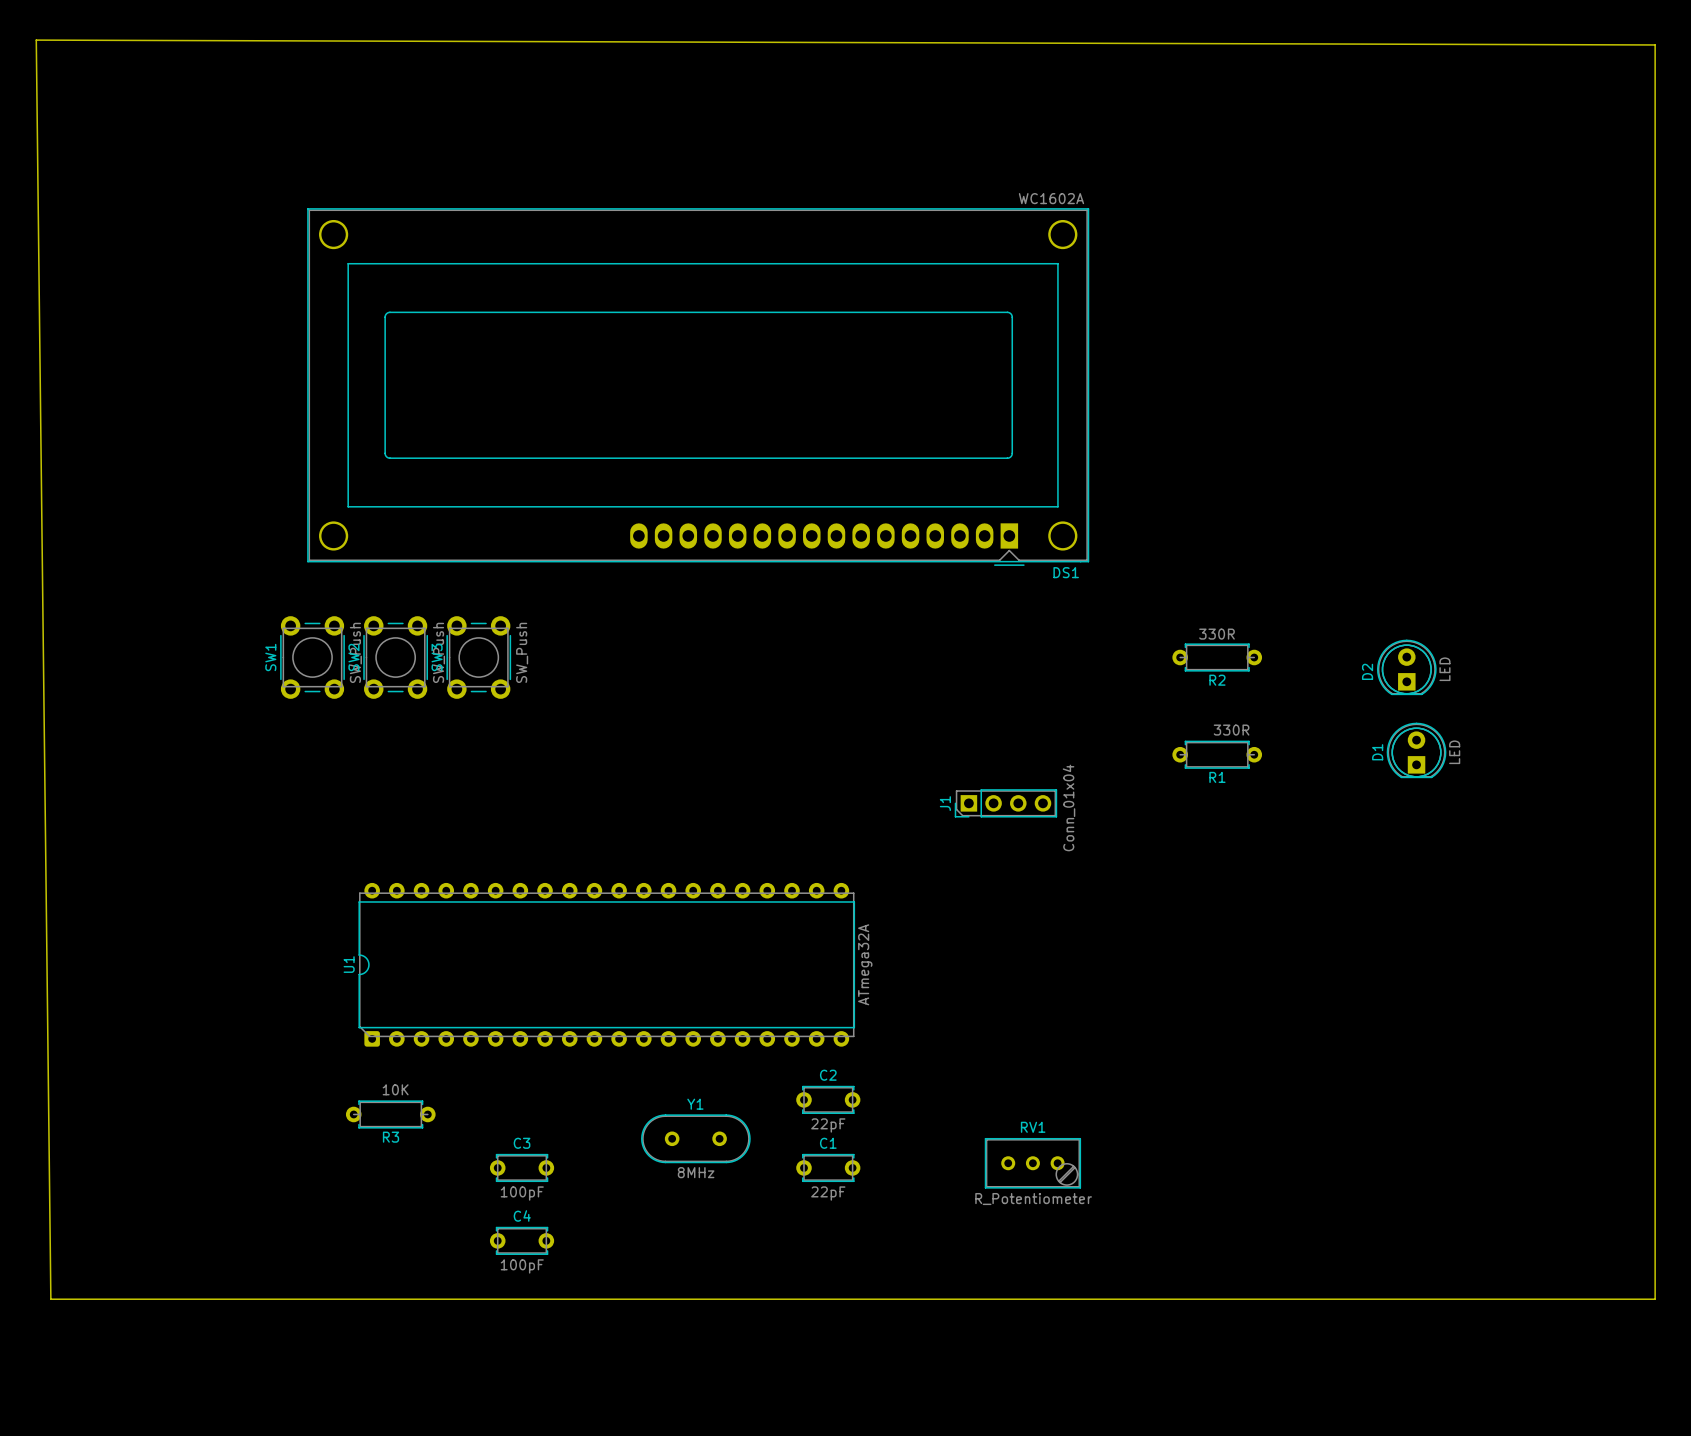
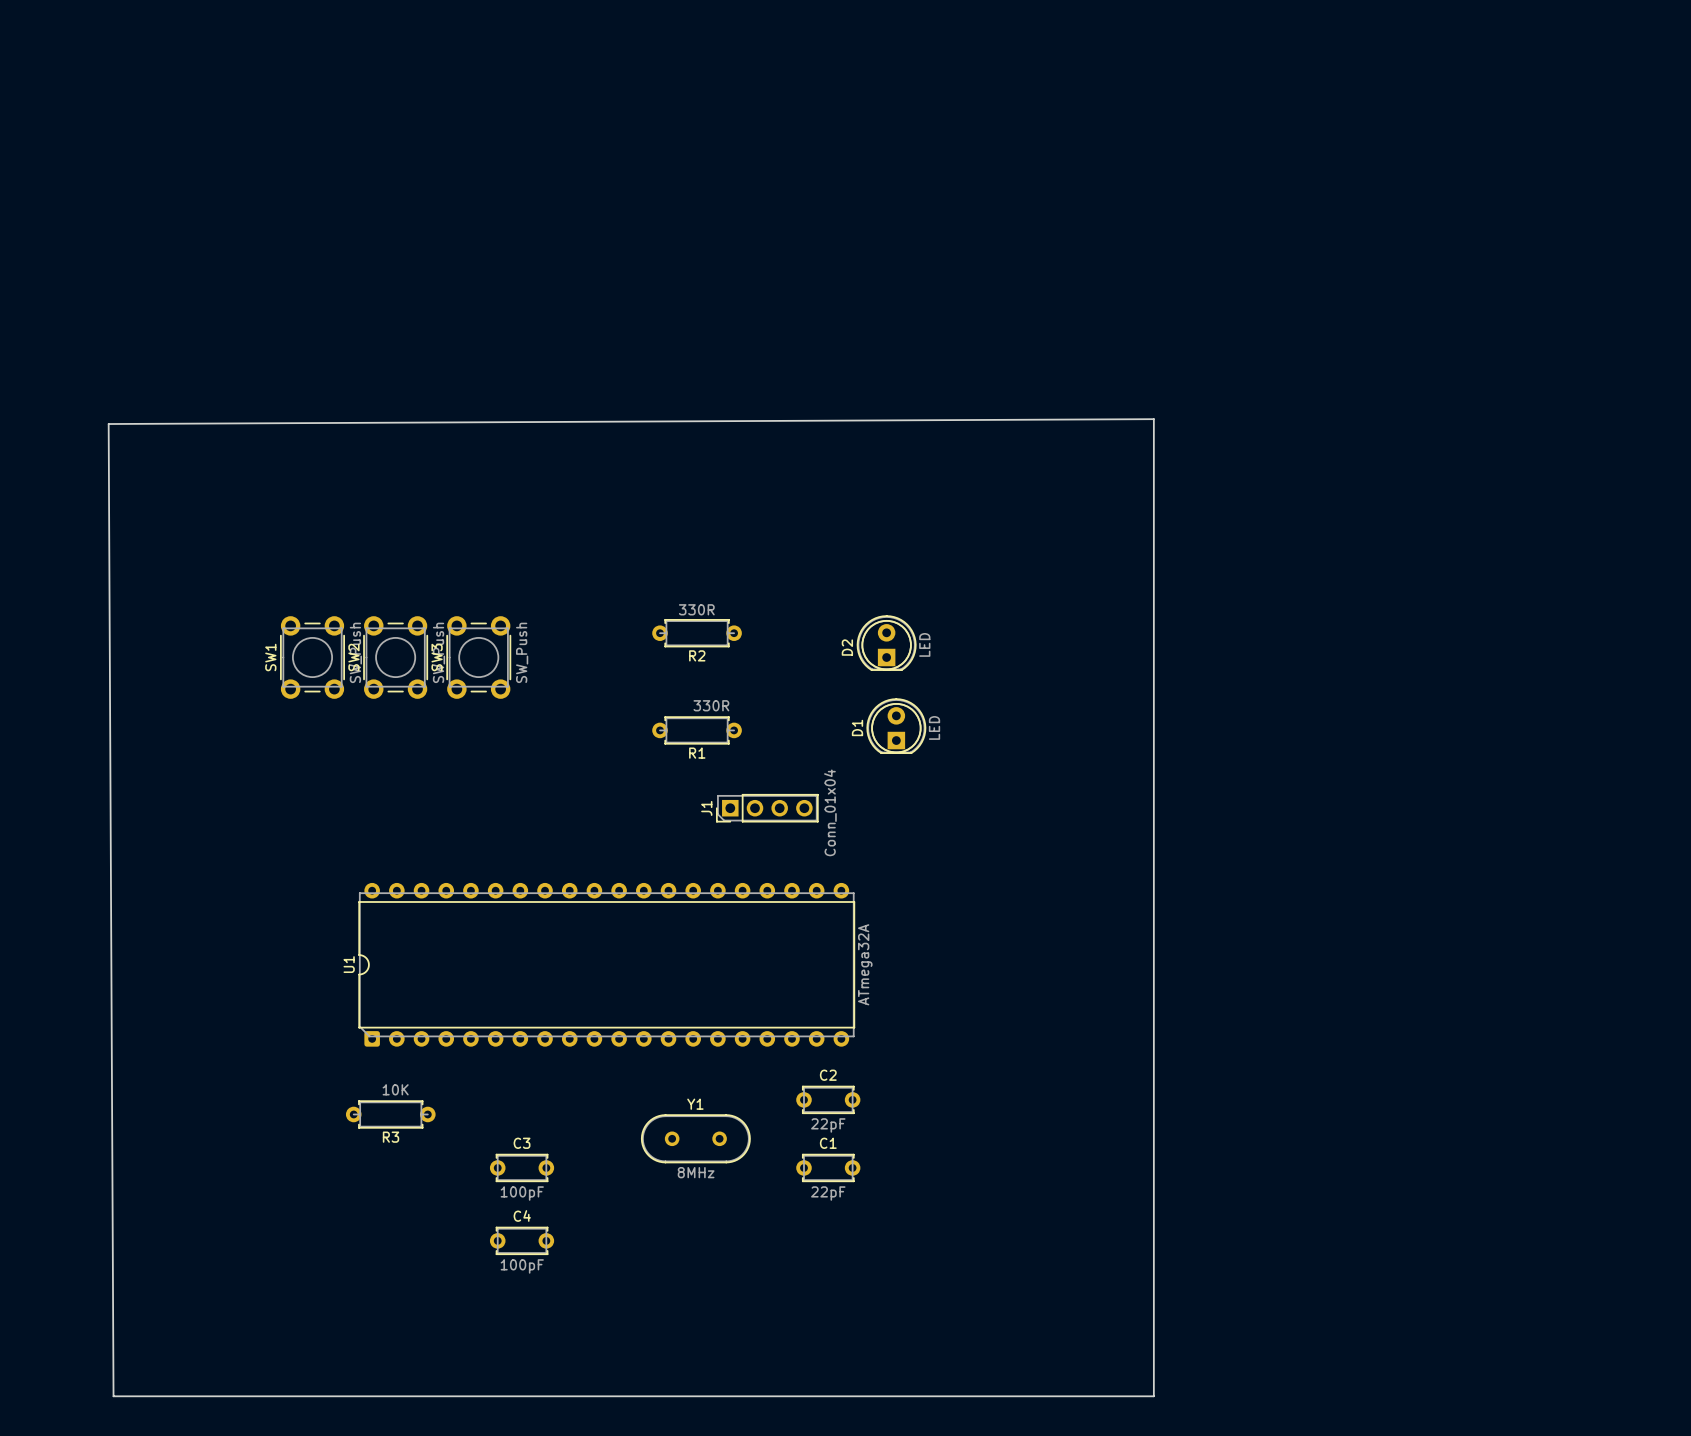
board edge: (36, 40) (1655, 44) (1655, 1299) (50, 1299) (36, 40) -> none
DS1: WC1602A (698, 387) -> none
board edge: none -> (1153, 419) (108, 424) (113, 1396) (1153, 1396) (1153, 419)
R2 position: (1217, 657) -> (697, 633)
D2 position: (1406, 667) -> (886, 643)
D1 position: (1416, 750) -> (896, 726)
R1 position: (1217, 754) -> (697, 730)
J1 position: (1005, 803) -> (767, 808)
RV1: R_Potentiometer (1032, 1163) -> none

